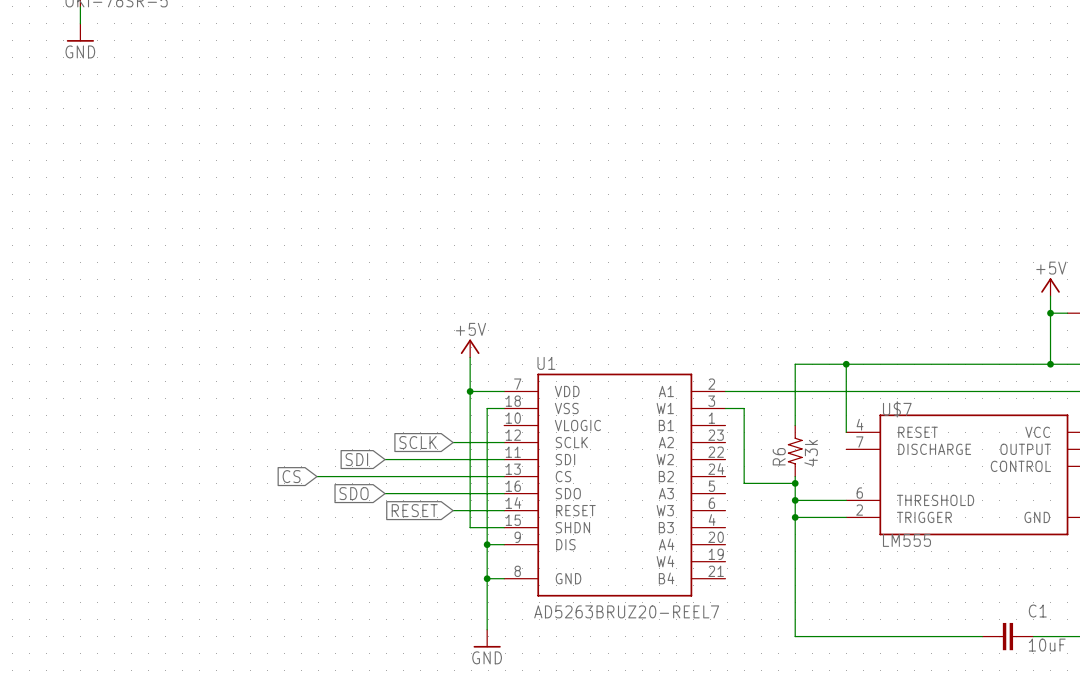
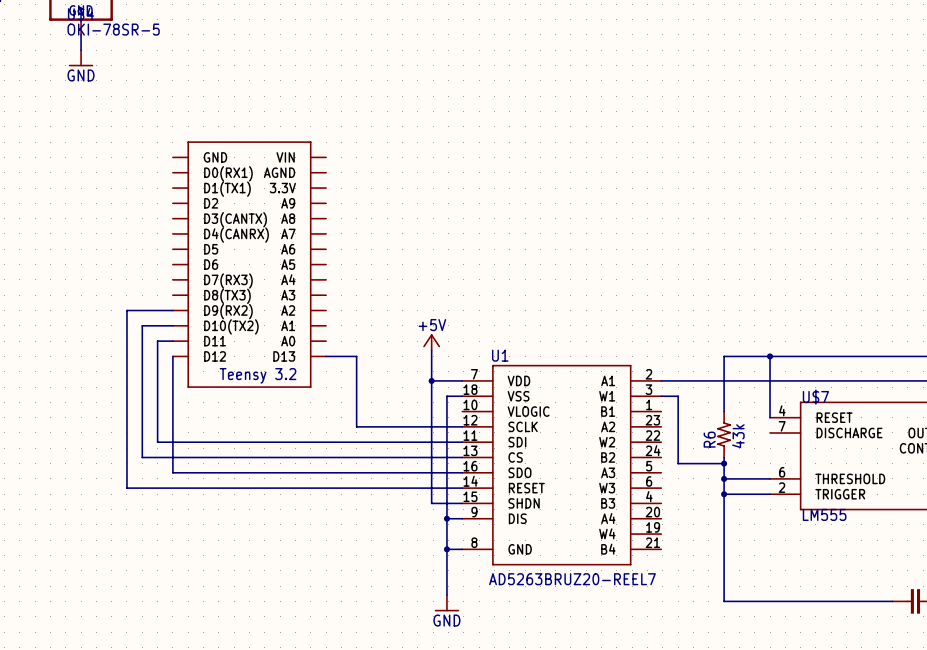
part: none -> (249, 264)
wire: none -> (172, 310) (126, 310) (126, 488) (416, 488)
wire: none -> (172, 325) (142, 325) (142, 457) (293, 457)
wire: none -> (172, 341) (157, 341) (157, 442) (355, 442)
wire: none -> (172, 356) (172, 472) (355, 472)
wire: none -> (326, 356) (356, 356) (356, 426) (416, 426)
global label: SCLK (418, 442) -> none
global label: SDI (356, 459) -> none
global label: CS (291, 476) -> none
global label: SDO (354, 493) -> none
global label: RESET (414, 510) -> none

